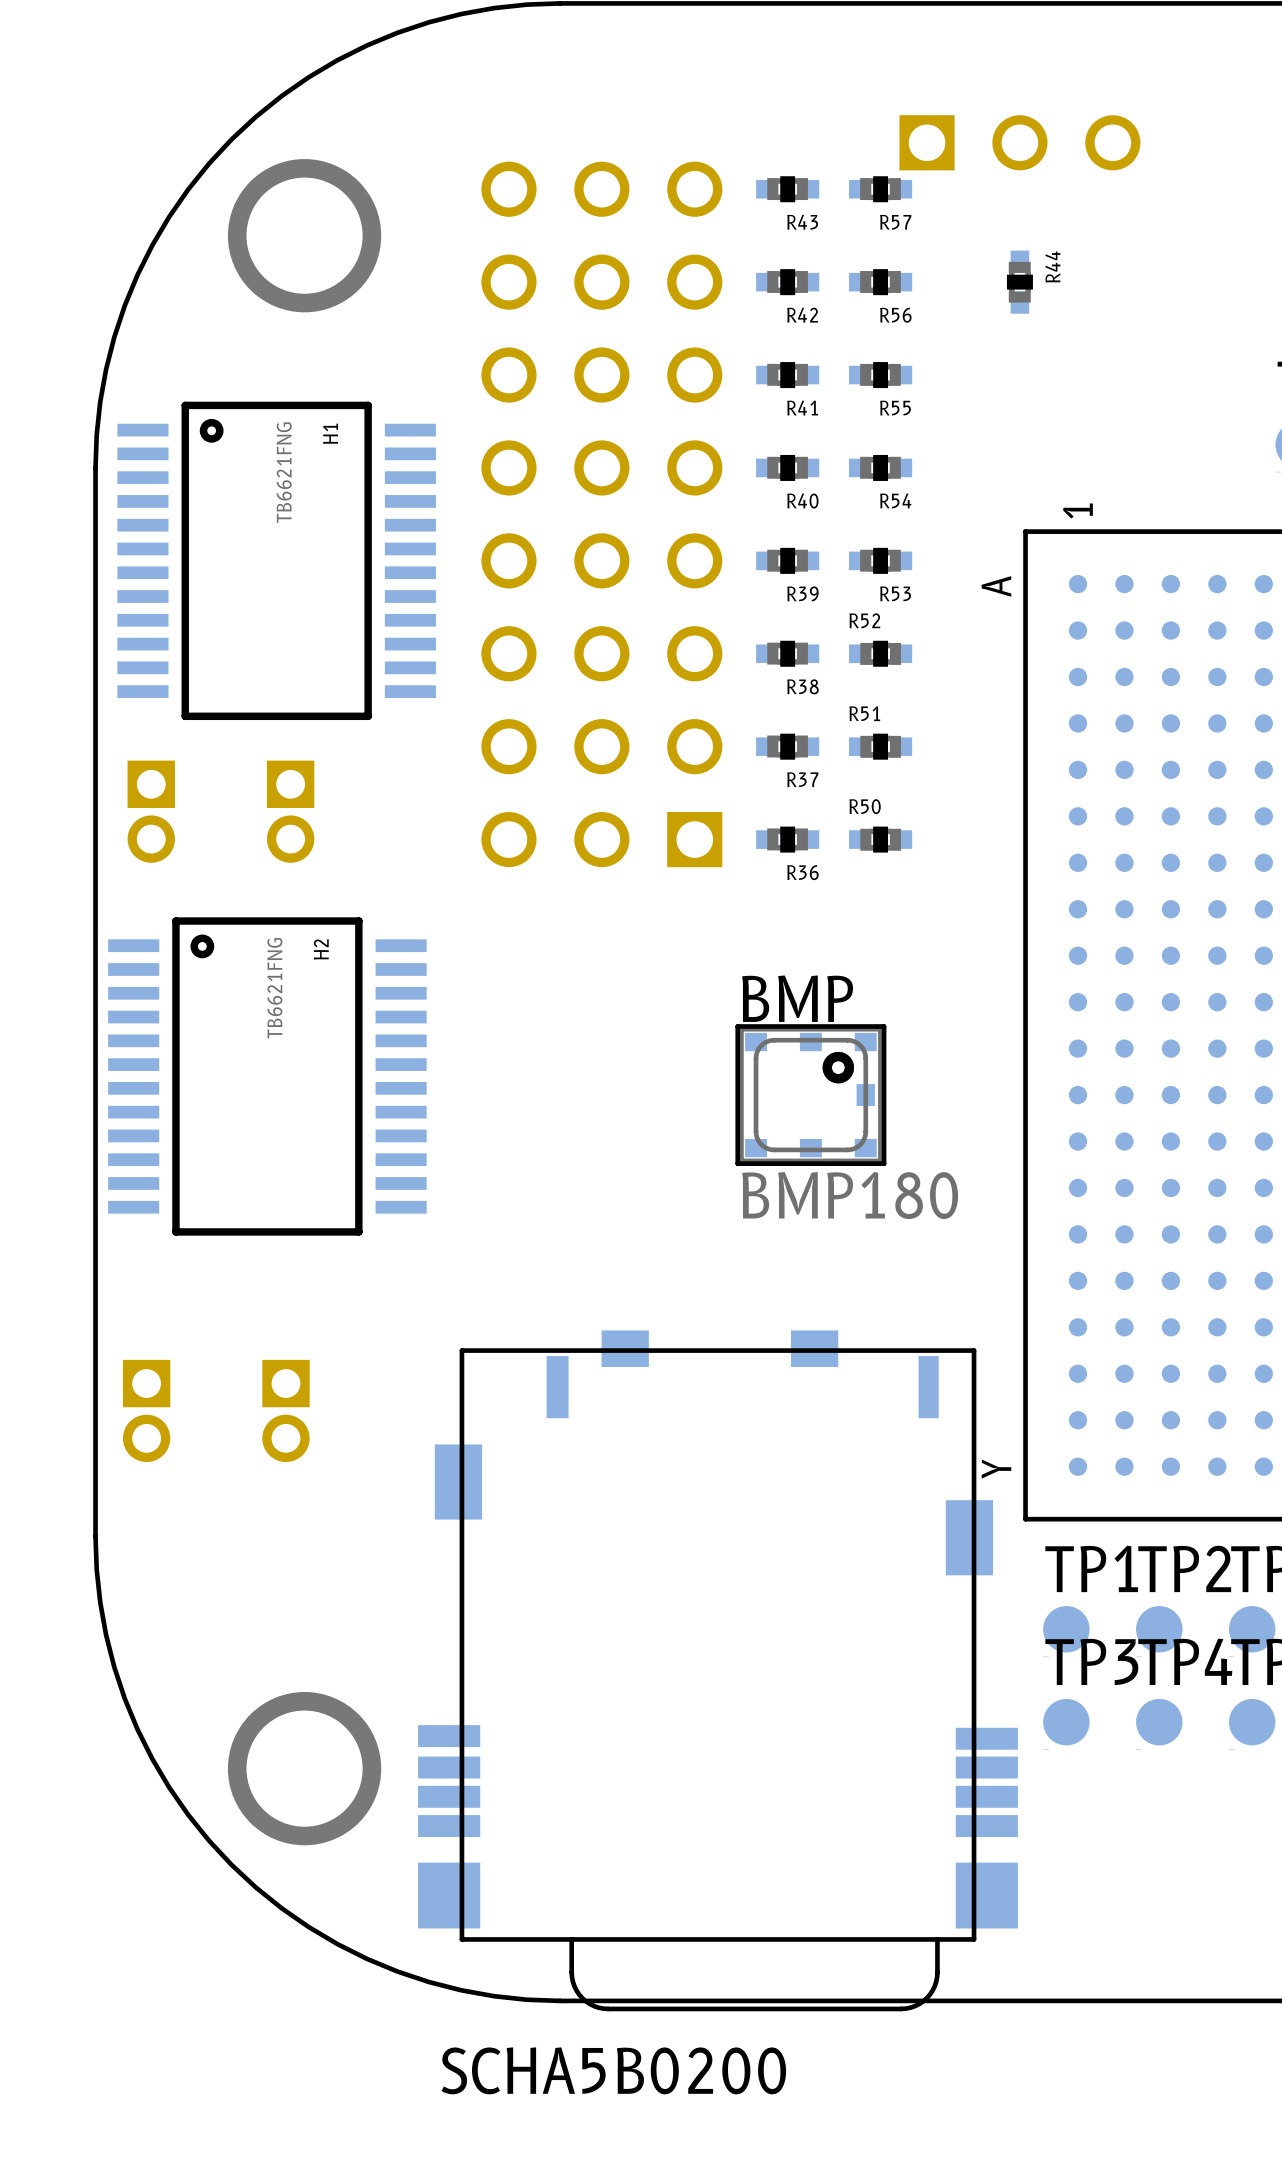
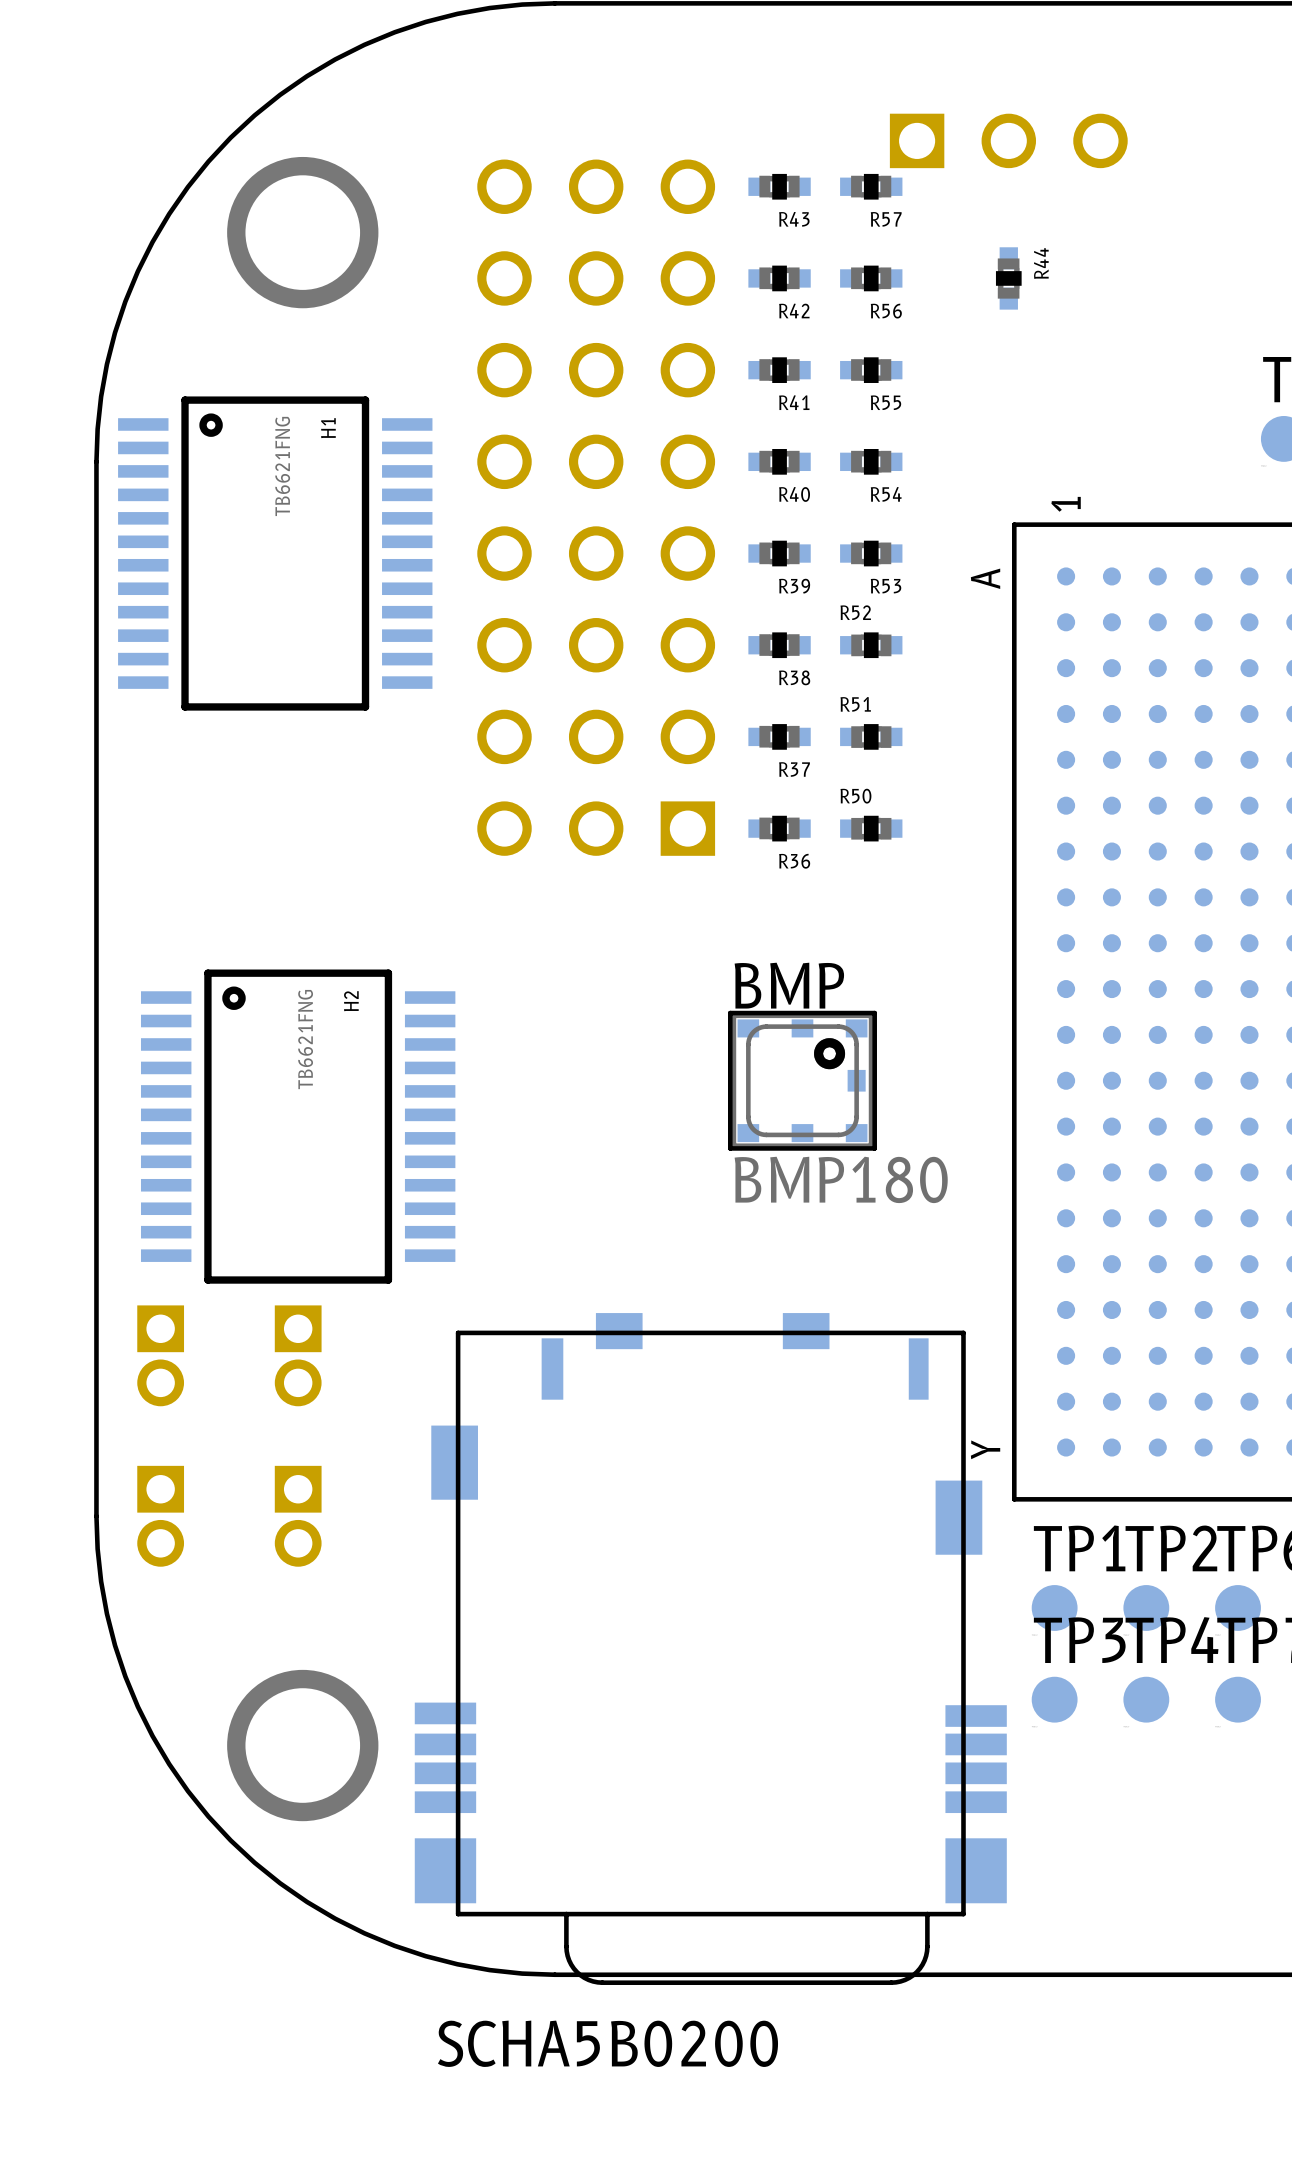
part: (151, 811) -> none
part: (290, 811) -> none
H2 position: (267, 1076) -> (298, 1126)
part position: (146, 1410) -> (160, 1355)
part position: (285, 1410) -> (298, 1355)
part: none -> (160, 1516)
part: none -> (298, 1516)

